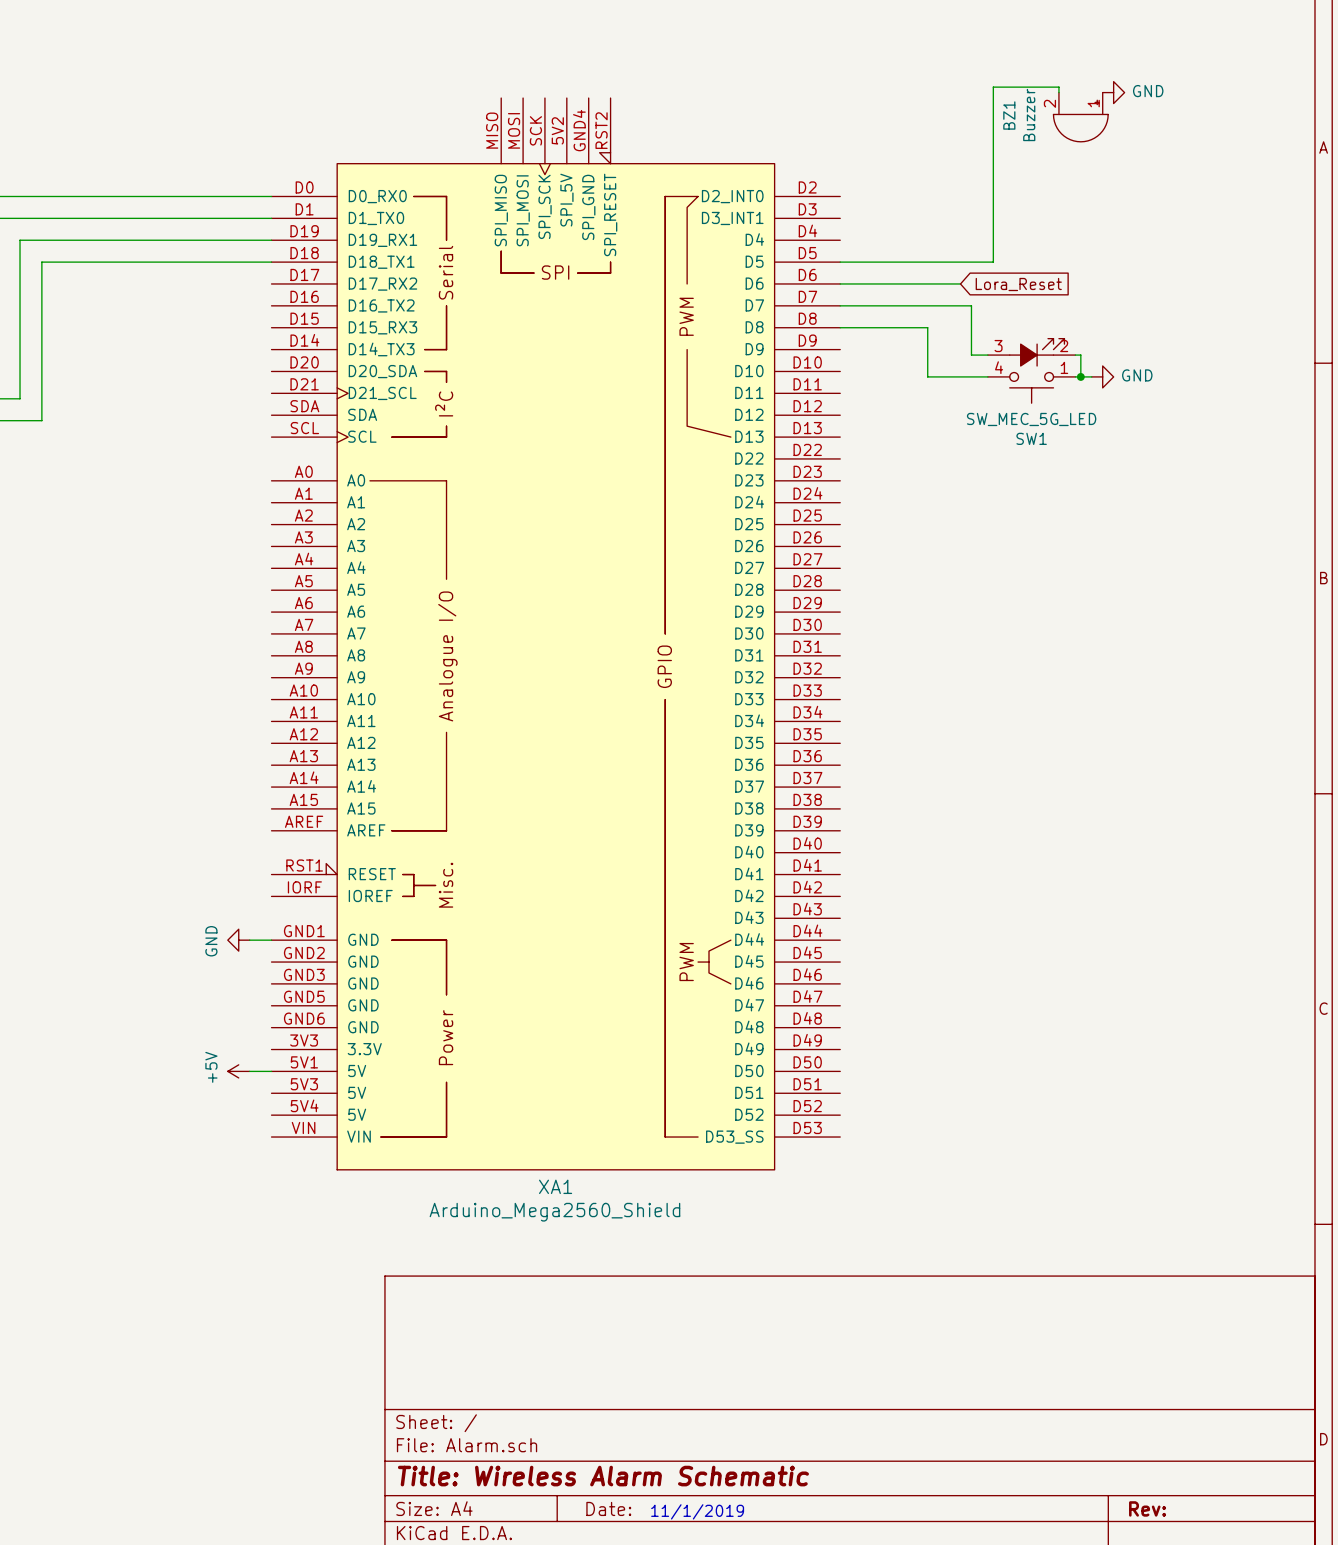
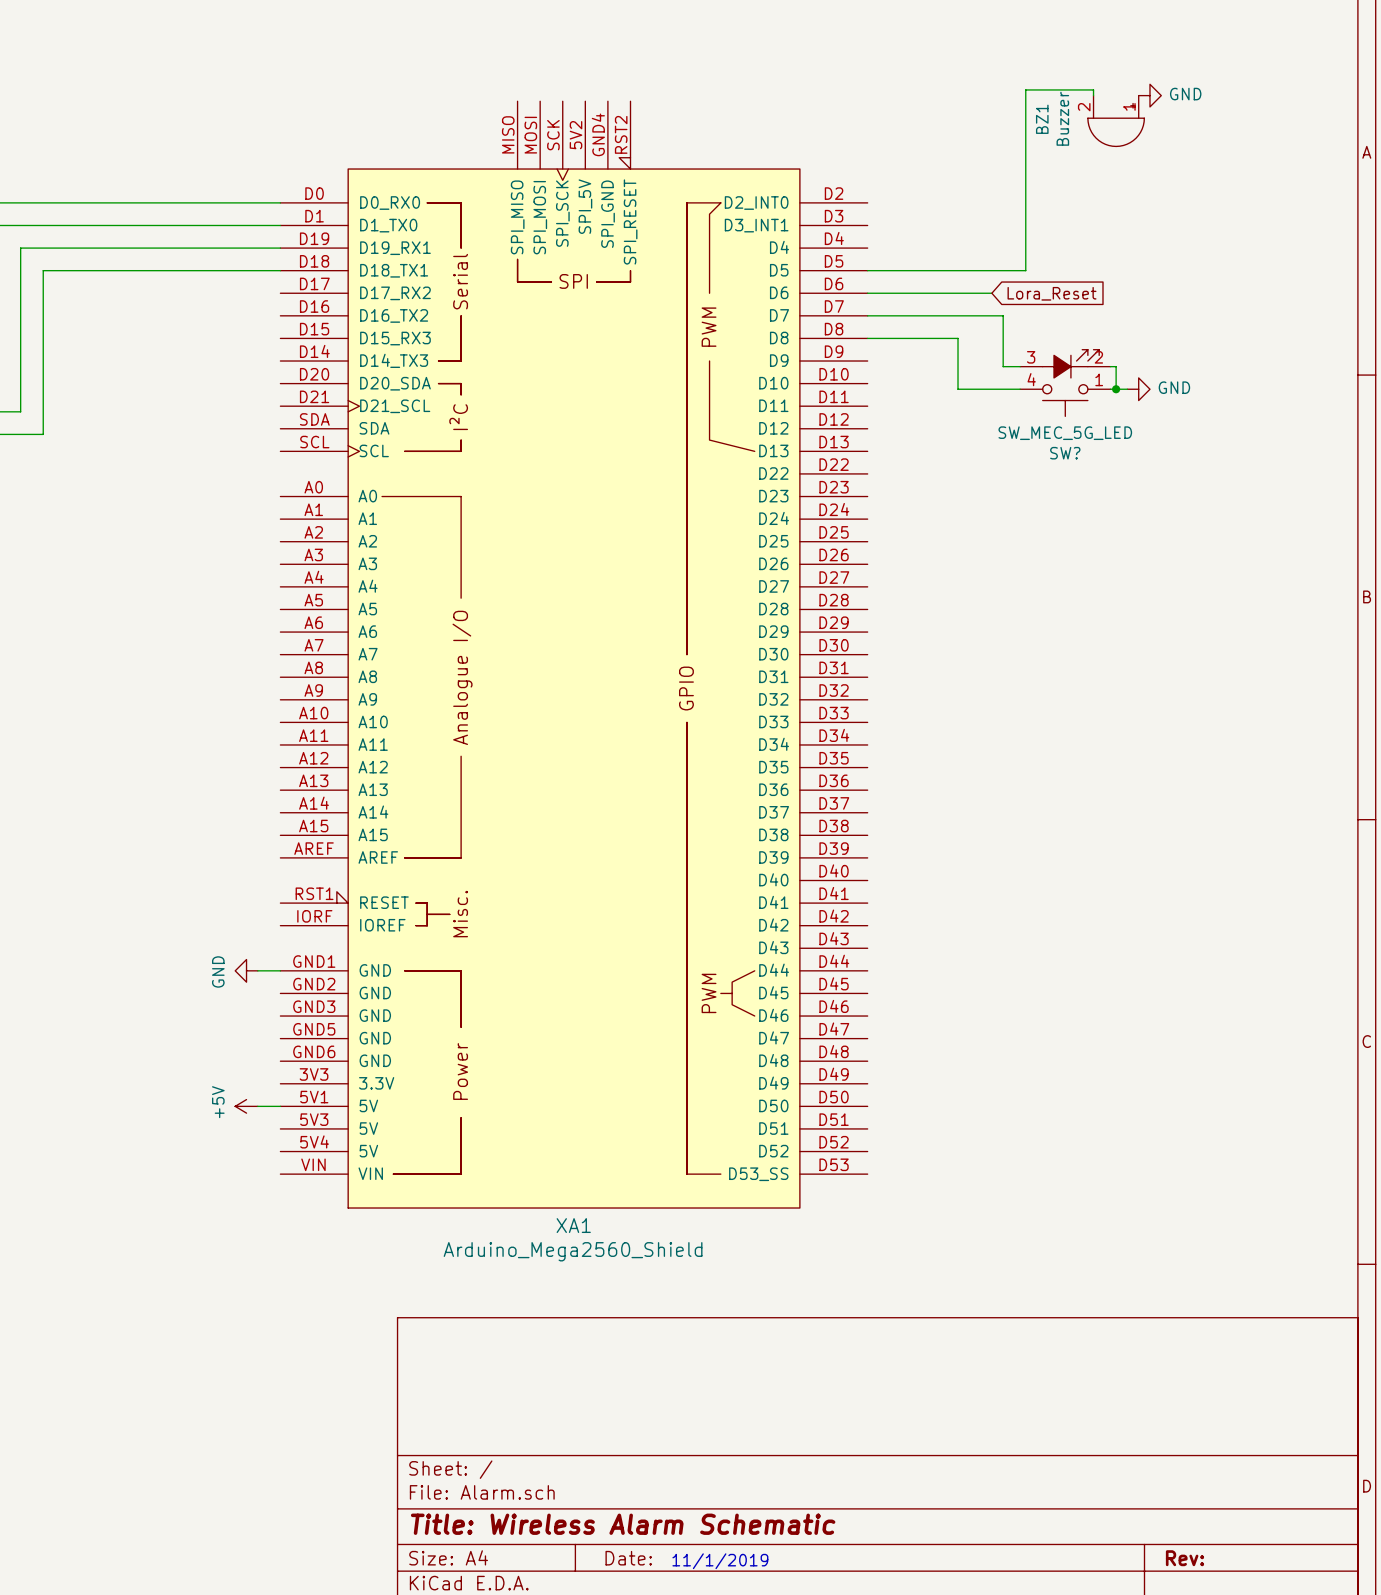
SW1 name: SW1 (1031, 438) -> SW? (1065, 453)

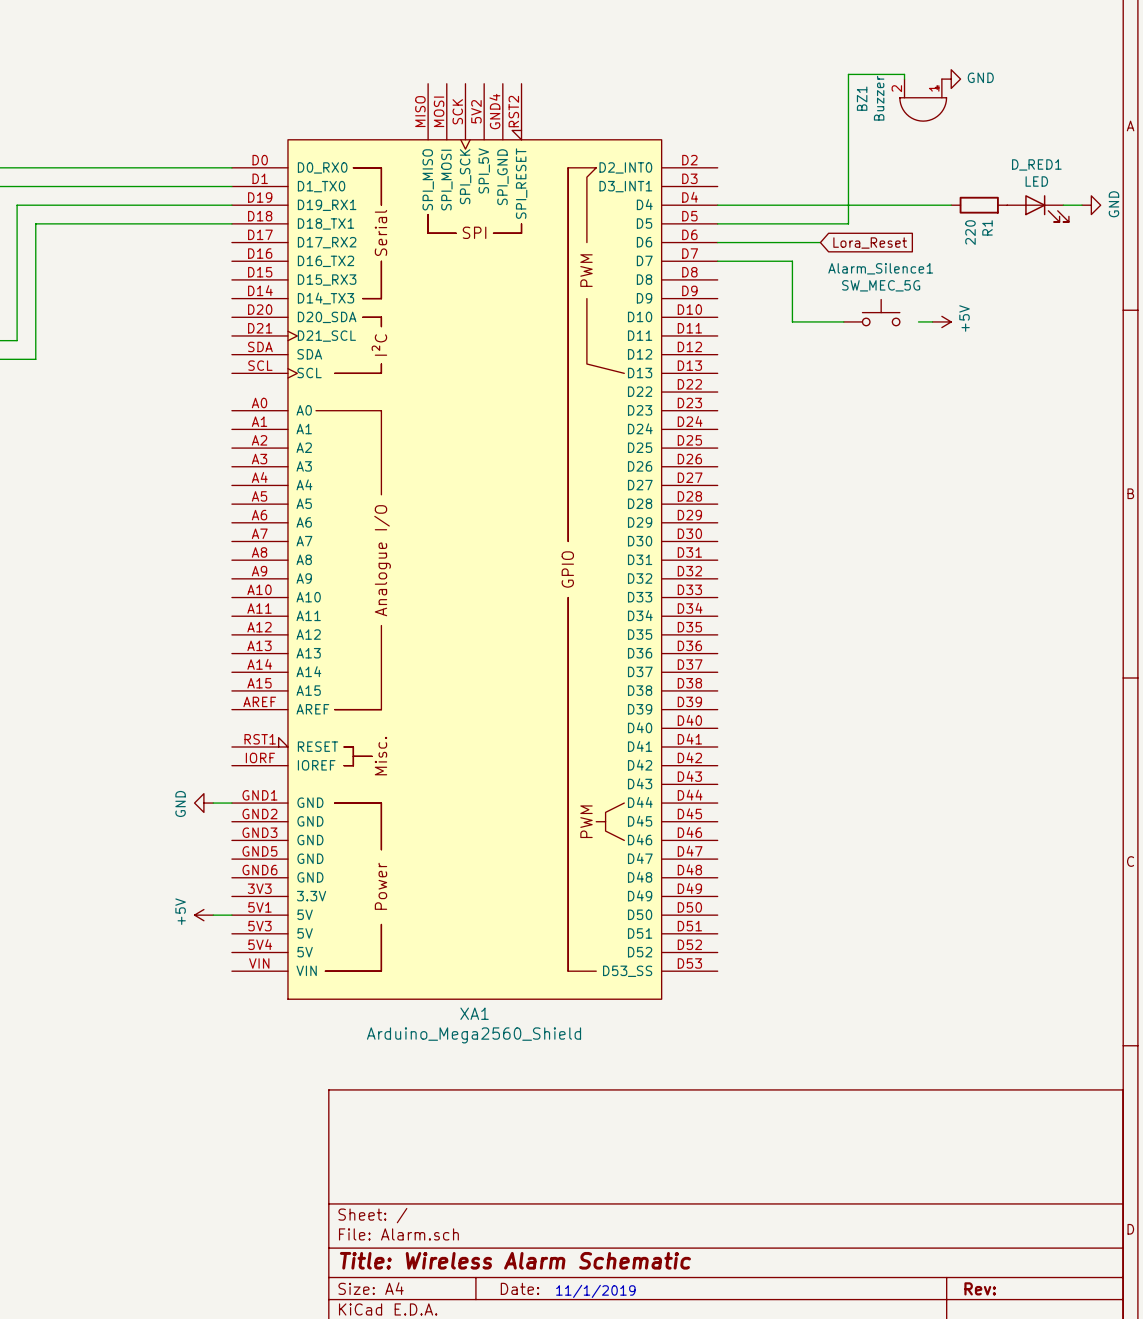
wire: none -> (717, 205) (951, 205)
R1: none -> 220 (979, 205)
wire: none -> (1063, 205) (1082, 205)
power symbol: none -> GND (1091, 205)
D_RED1: none -> LED (1038, 208)
wire: (958, 315) (1003, 315) (1003, 366) (1020, 366) -> (792, 261) (792, 279)
wire: (867, 338) (958, 338) -> none
wire: (1110, 366) (1116, 366) (1116, 389) -> none
Alarm_Silence1: none -> SW_MEC_5G (871, 312)
SW?: SW_MEC_5G_LED (1065, 383) -> none
junction: (1116, 389) -> none
power symbol: GND (1138, 389) -> +5V (941, 321)

